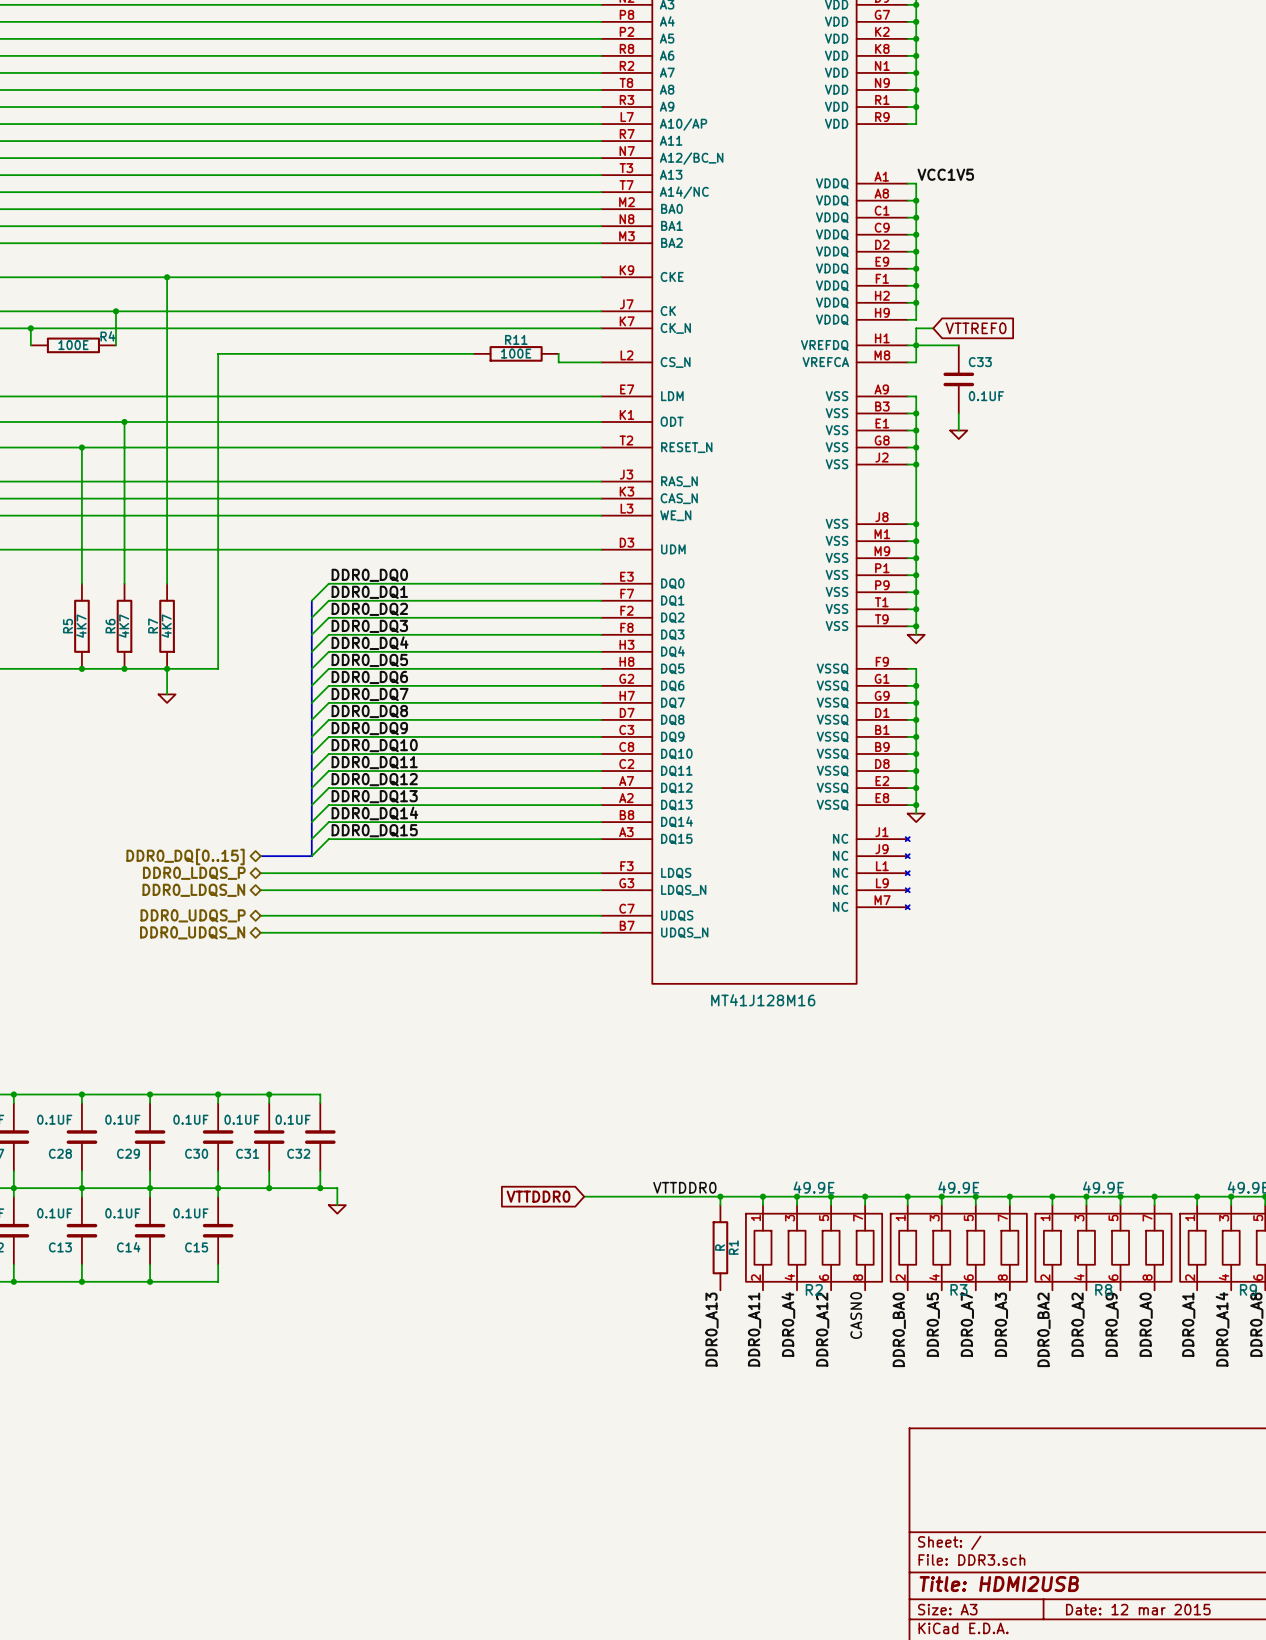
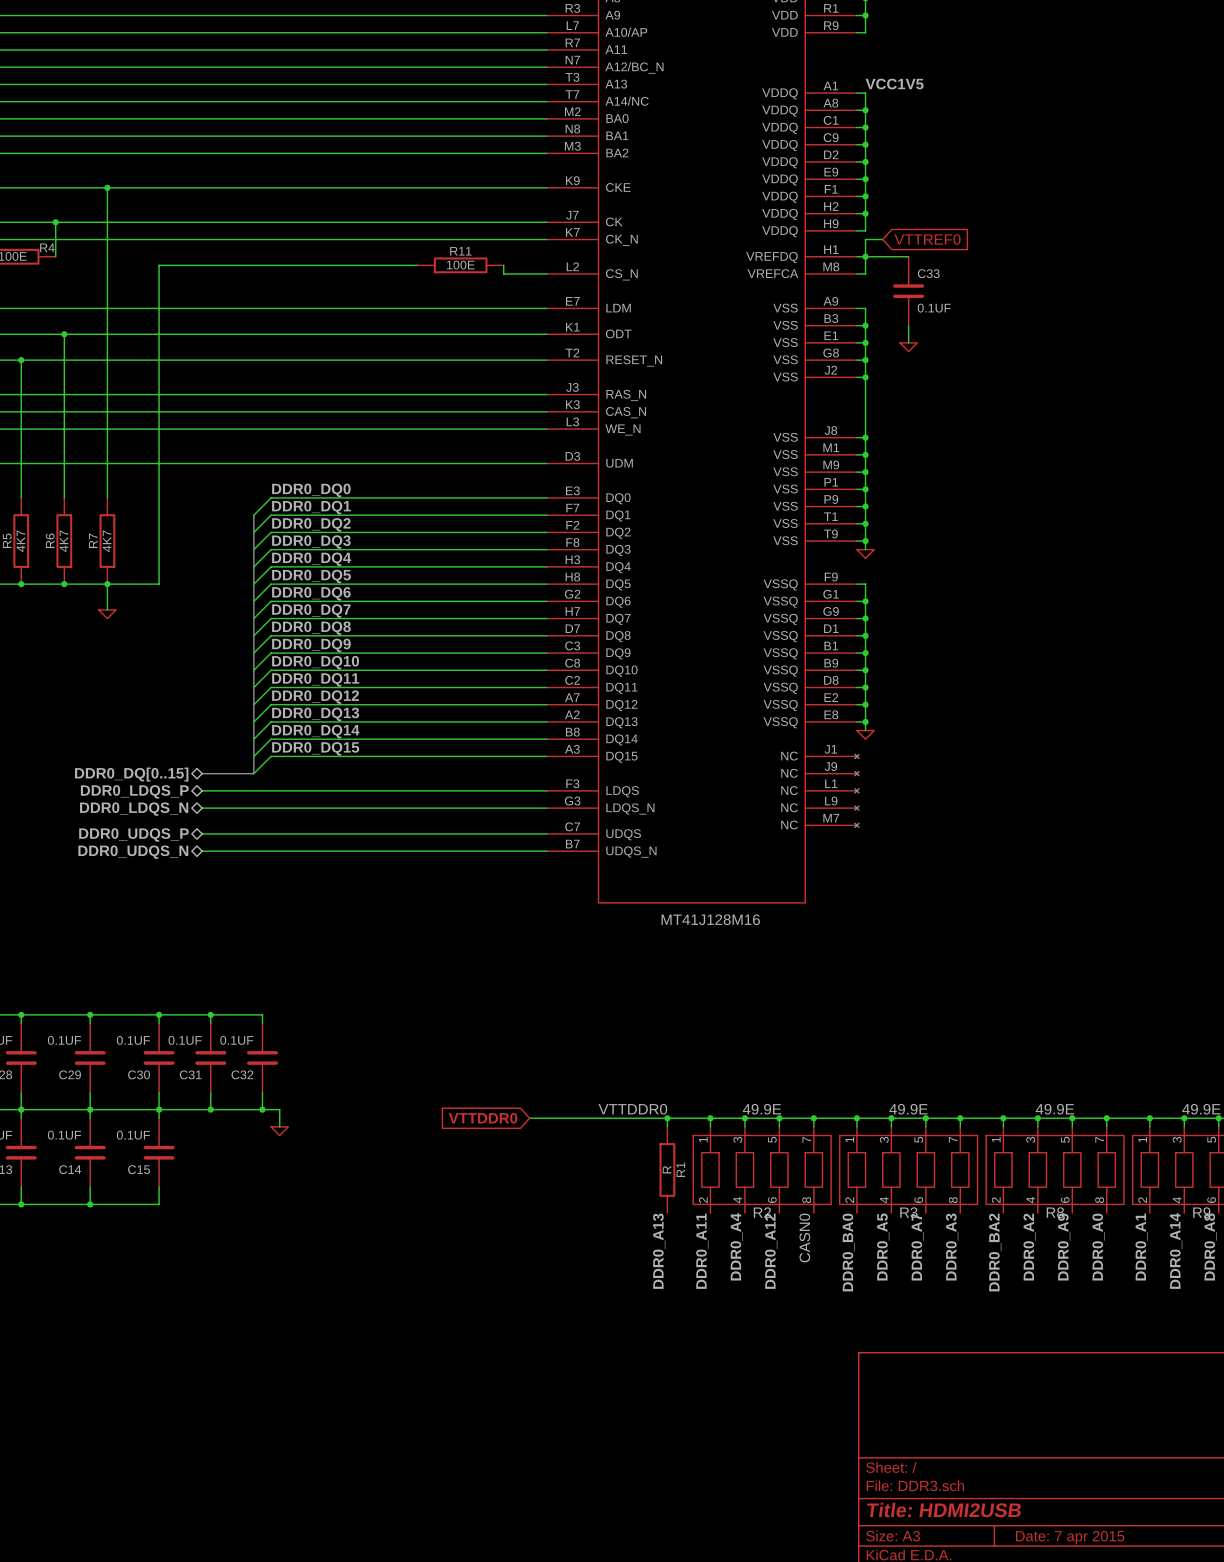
title block: Date: 12 mar 2015 (1138, 1609) -> Date: 7 apr 2015 (1070, 1537)

